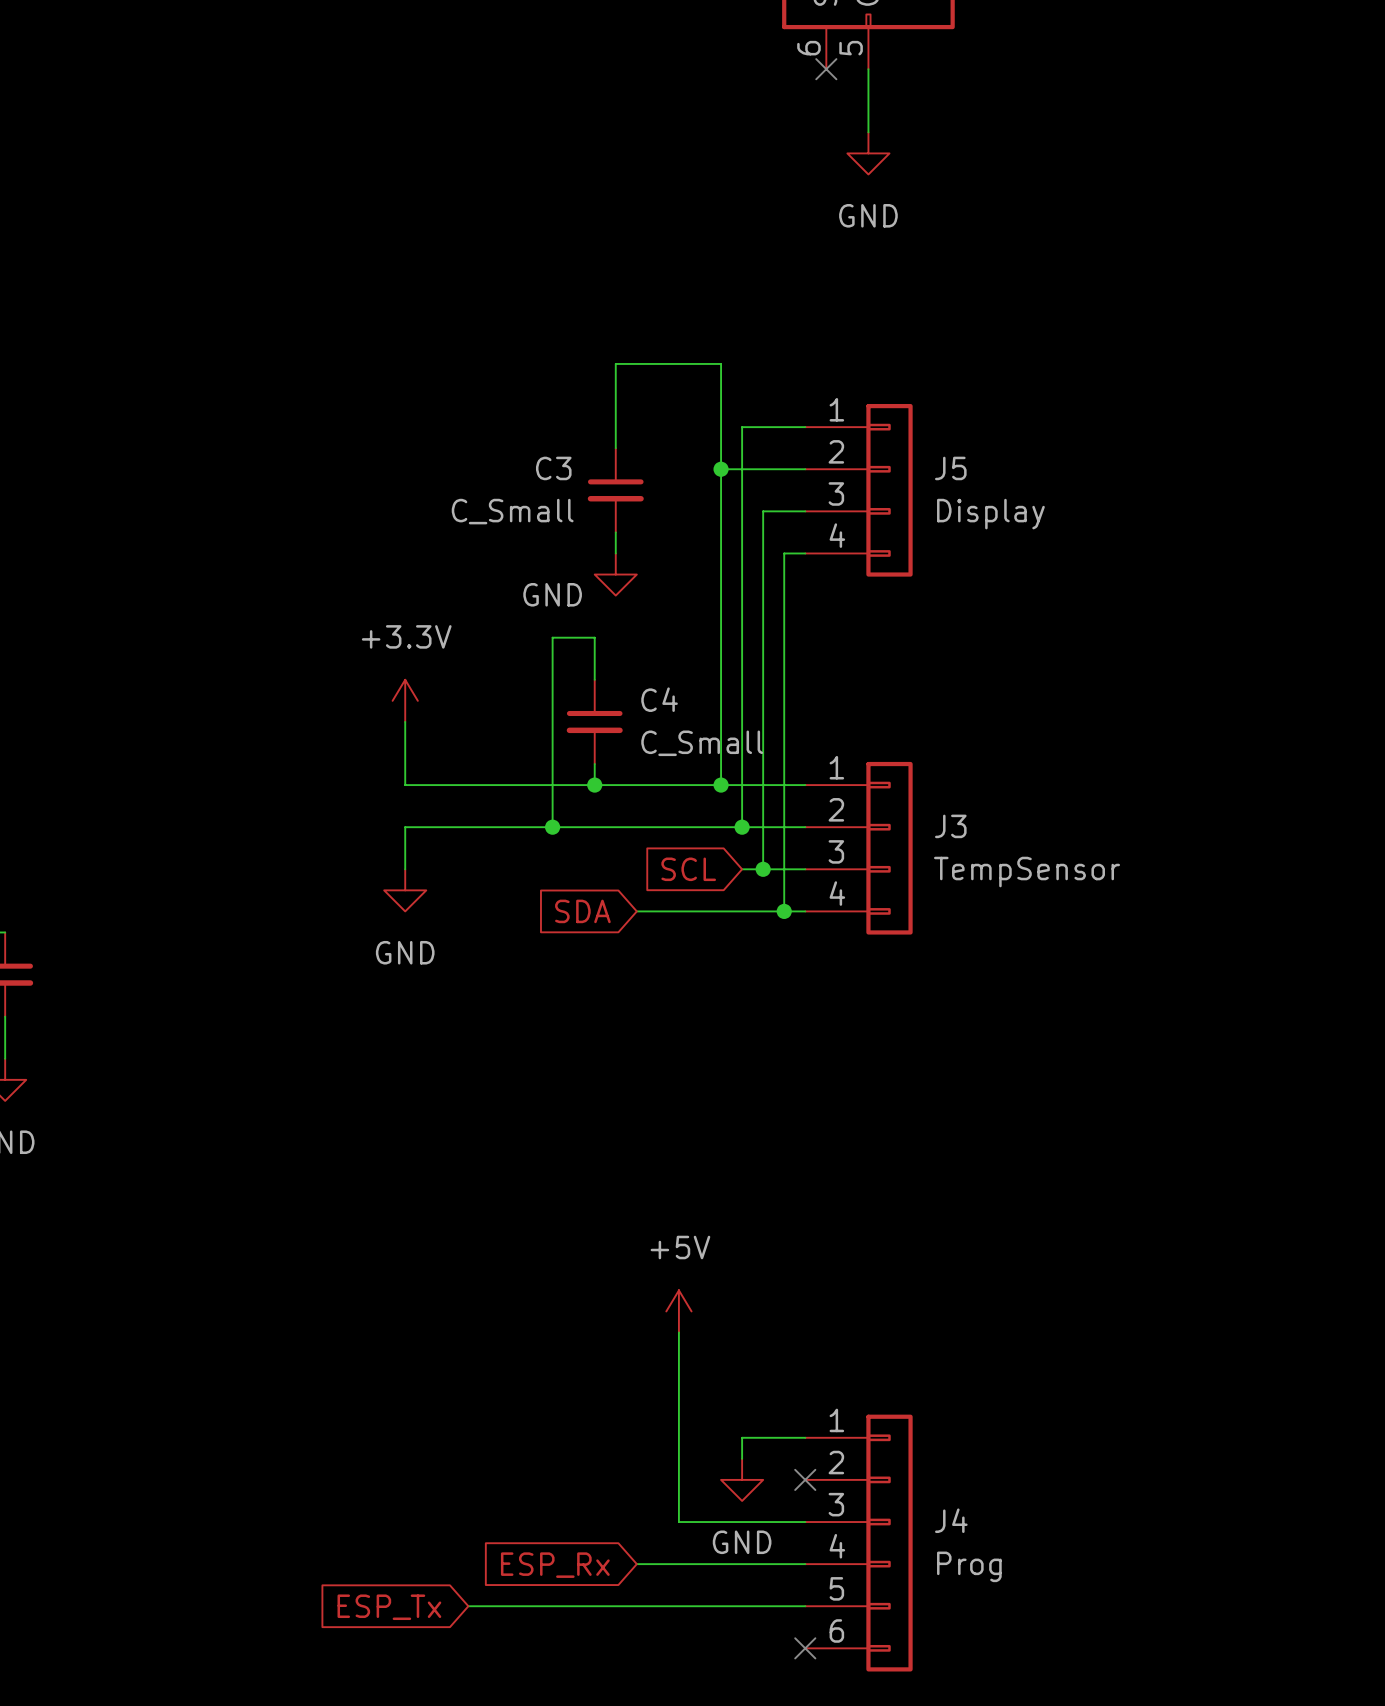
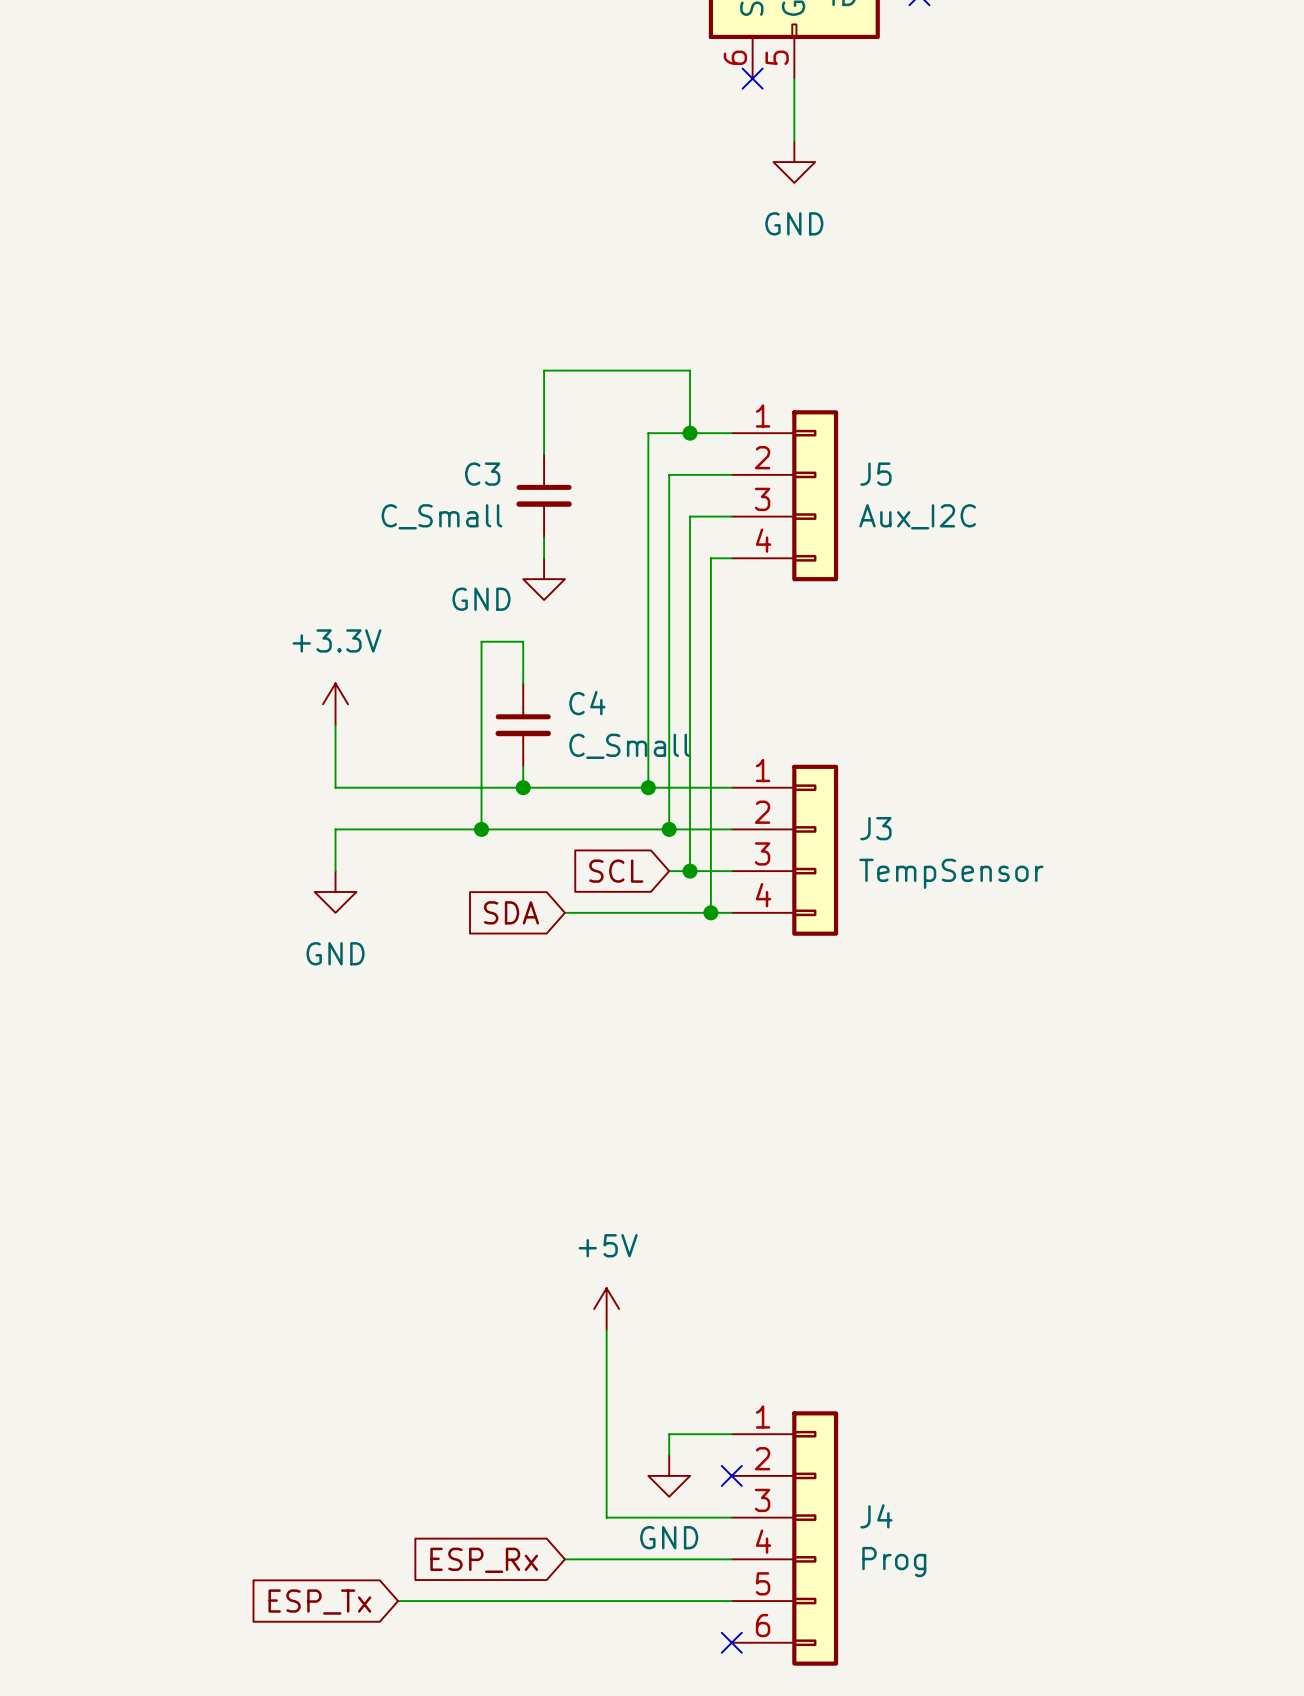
wire: (721, 363) (721, 427) -> (648, 370) (690, 370) (690, 433)
wire: (742, 427) (742, 469) (721, 469) -> (669, 433) (648, 433)
junction position: (721, 469) -> (690, 433)
J5 value: Display (990, 514) -> Aux_I2C (917, 516)

